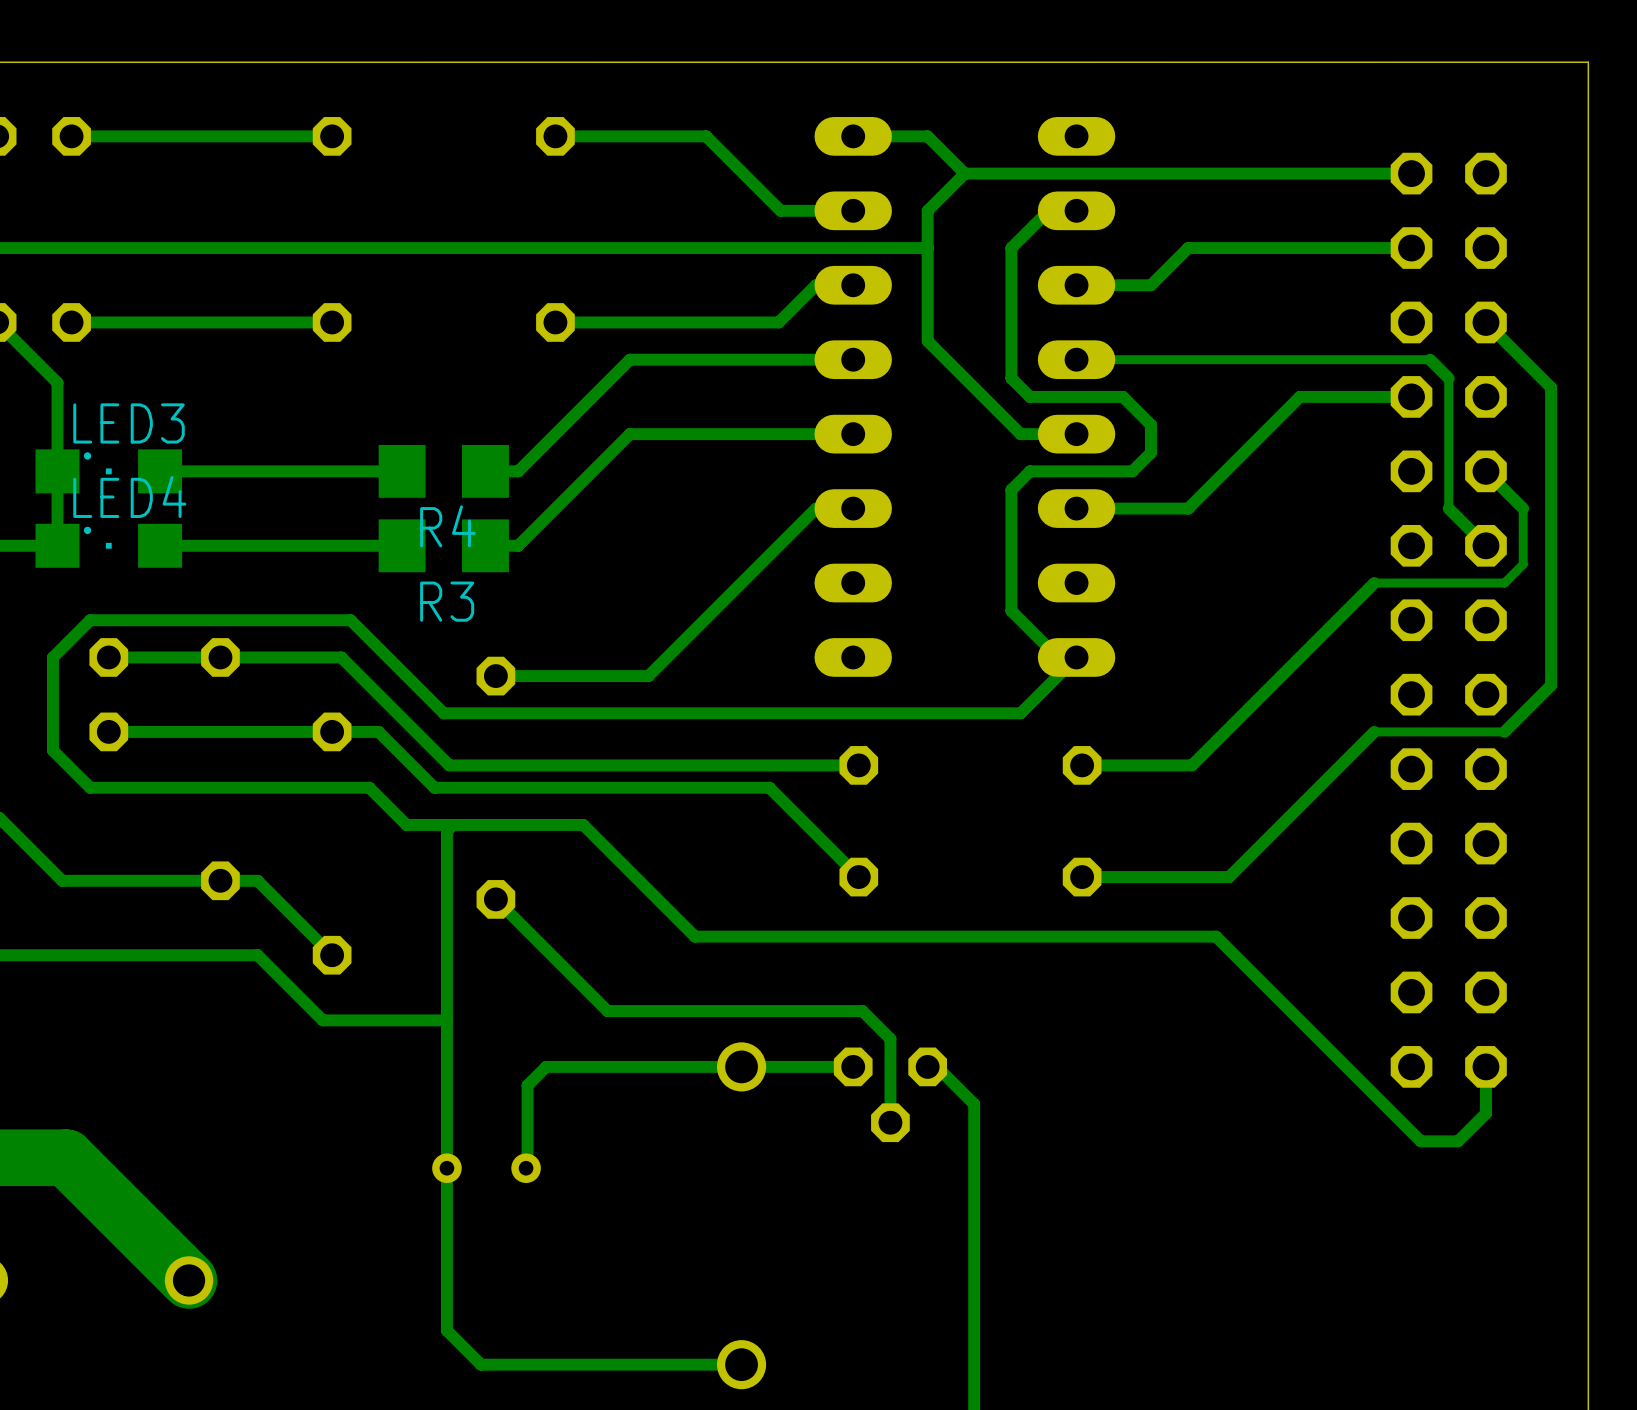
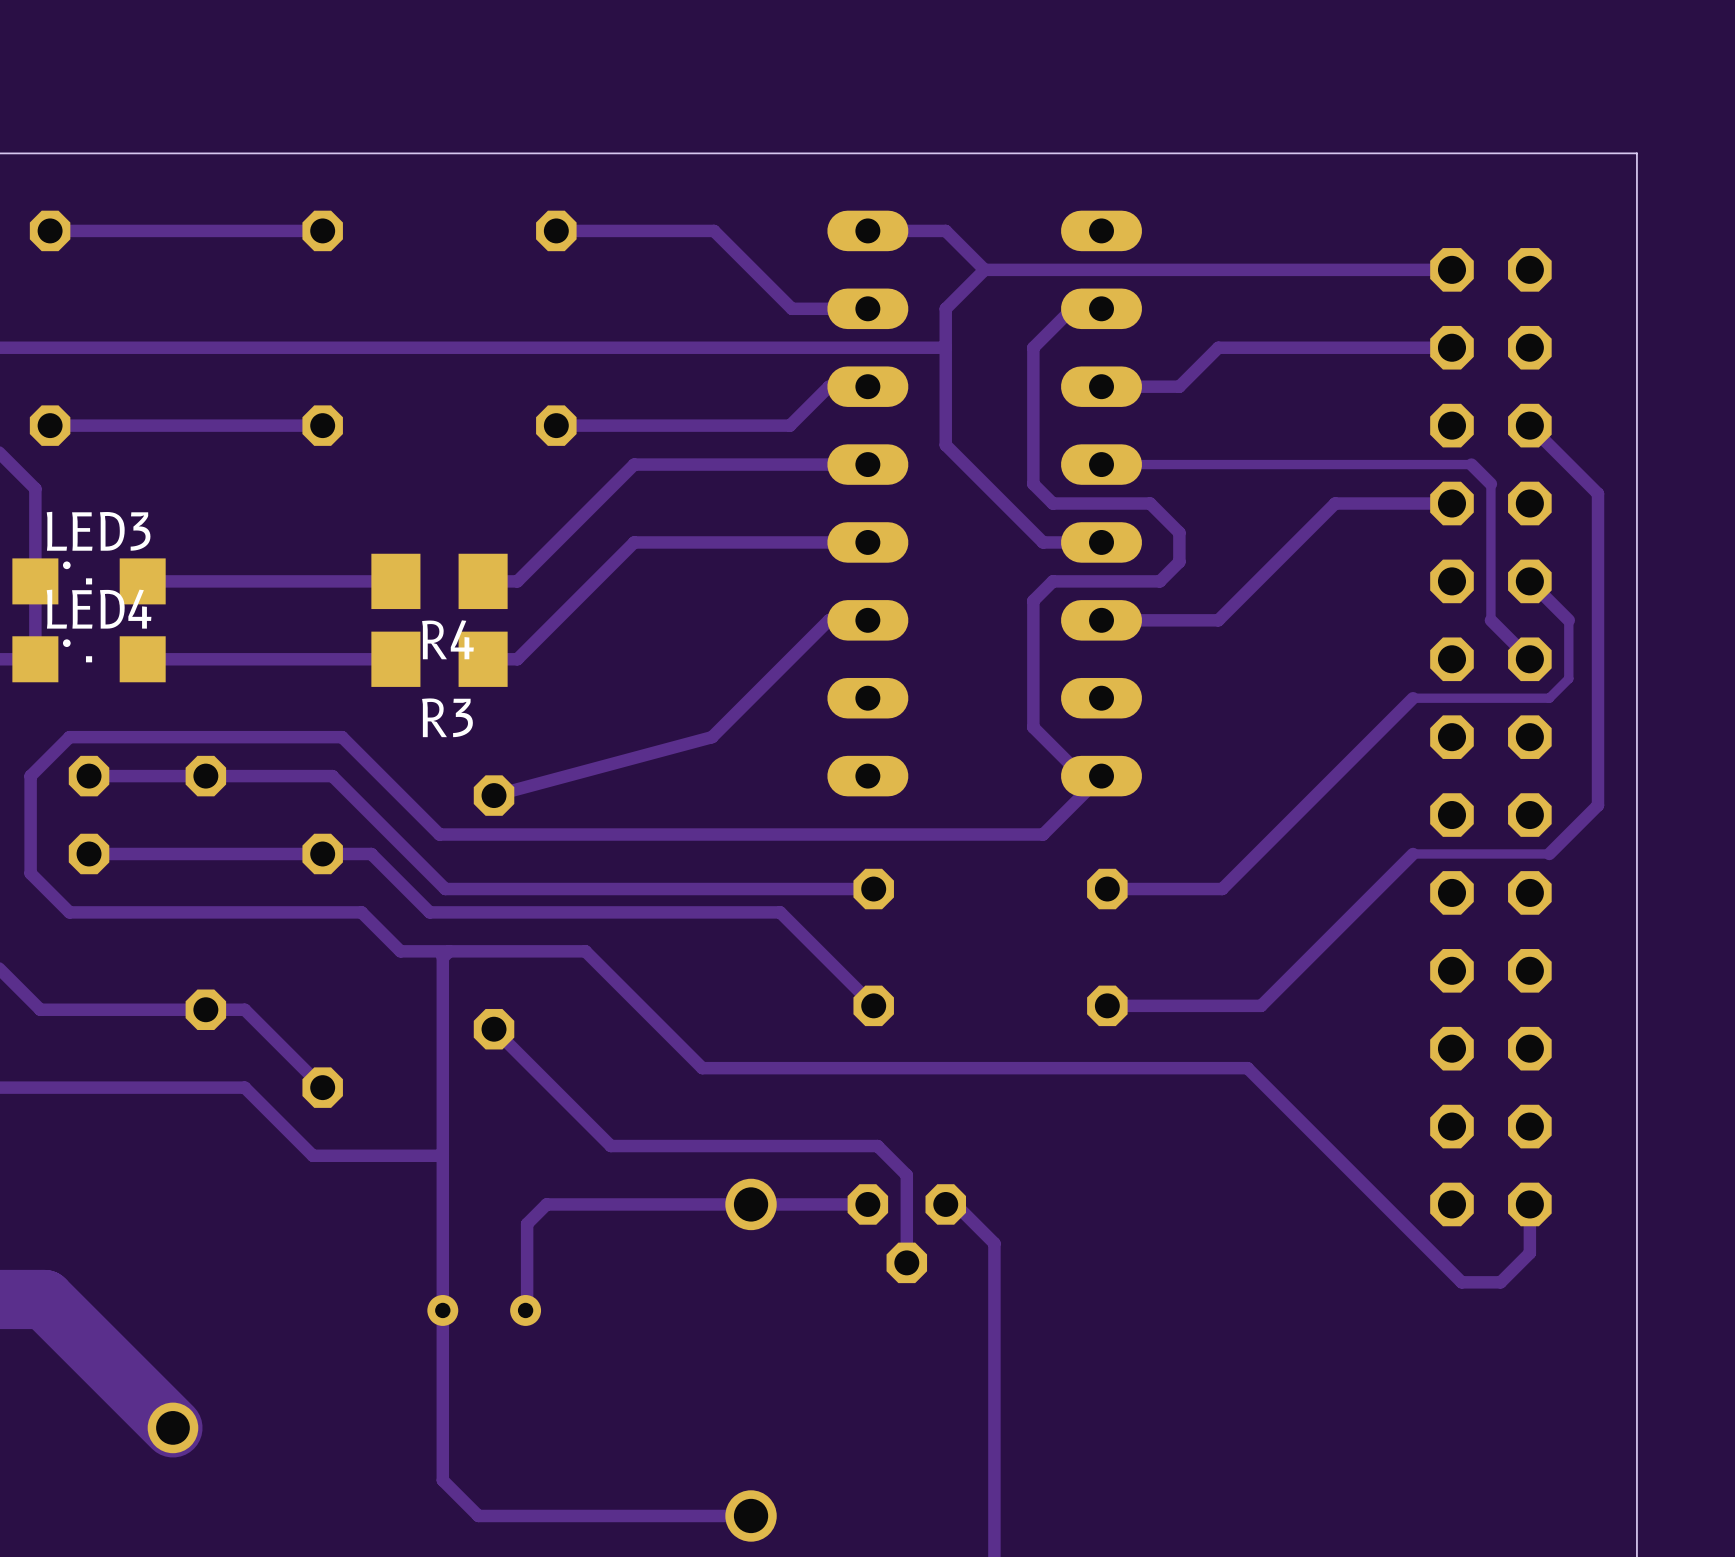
track: (704, 620) (648, 676) (495, 676) -> (712, 737) (494, 795)

